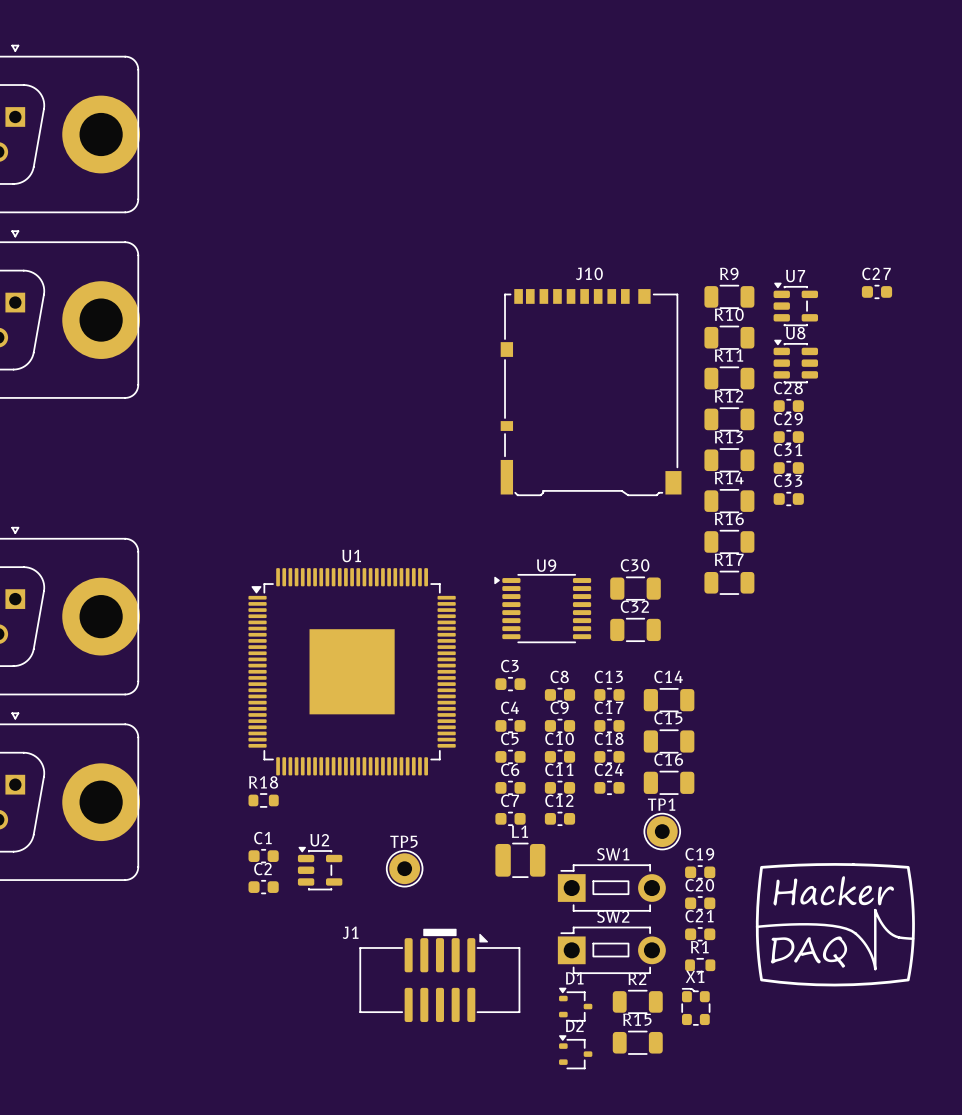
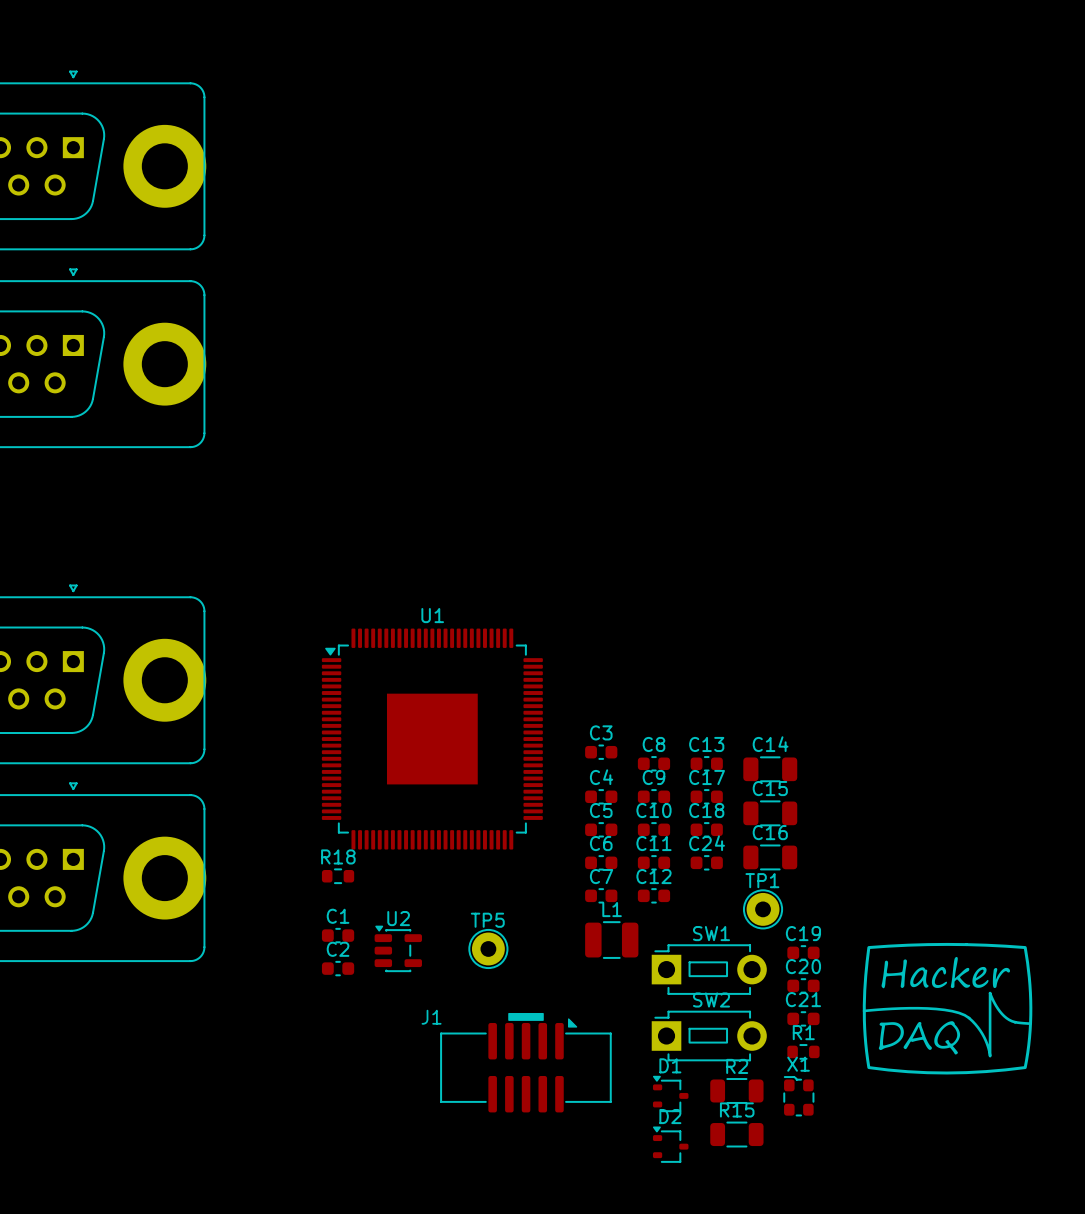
C27: (876, 291) -> none
R9: (729, 296) -> none
U7: (795, 304) -> none
R10: (729, 337) -> none
U8: (795, 361) -> none
R11: (729, 378) -> none
J10: (591, 392) -> none
C28: (788, 406) -> none
R12: (729, 419) -> none
C29: (788, 437) -> none
R13: (729, 460) -> none
C31: (788, 468) -> none
C33: (788, 499) -> none
R14: (729, 501) -> none
R16: (729, 541) -> none
R17: (729, 582) -> none
C30: (635, 588) -> none
U9: (542, 608) -> none
C32: (635, 629) -> none

